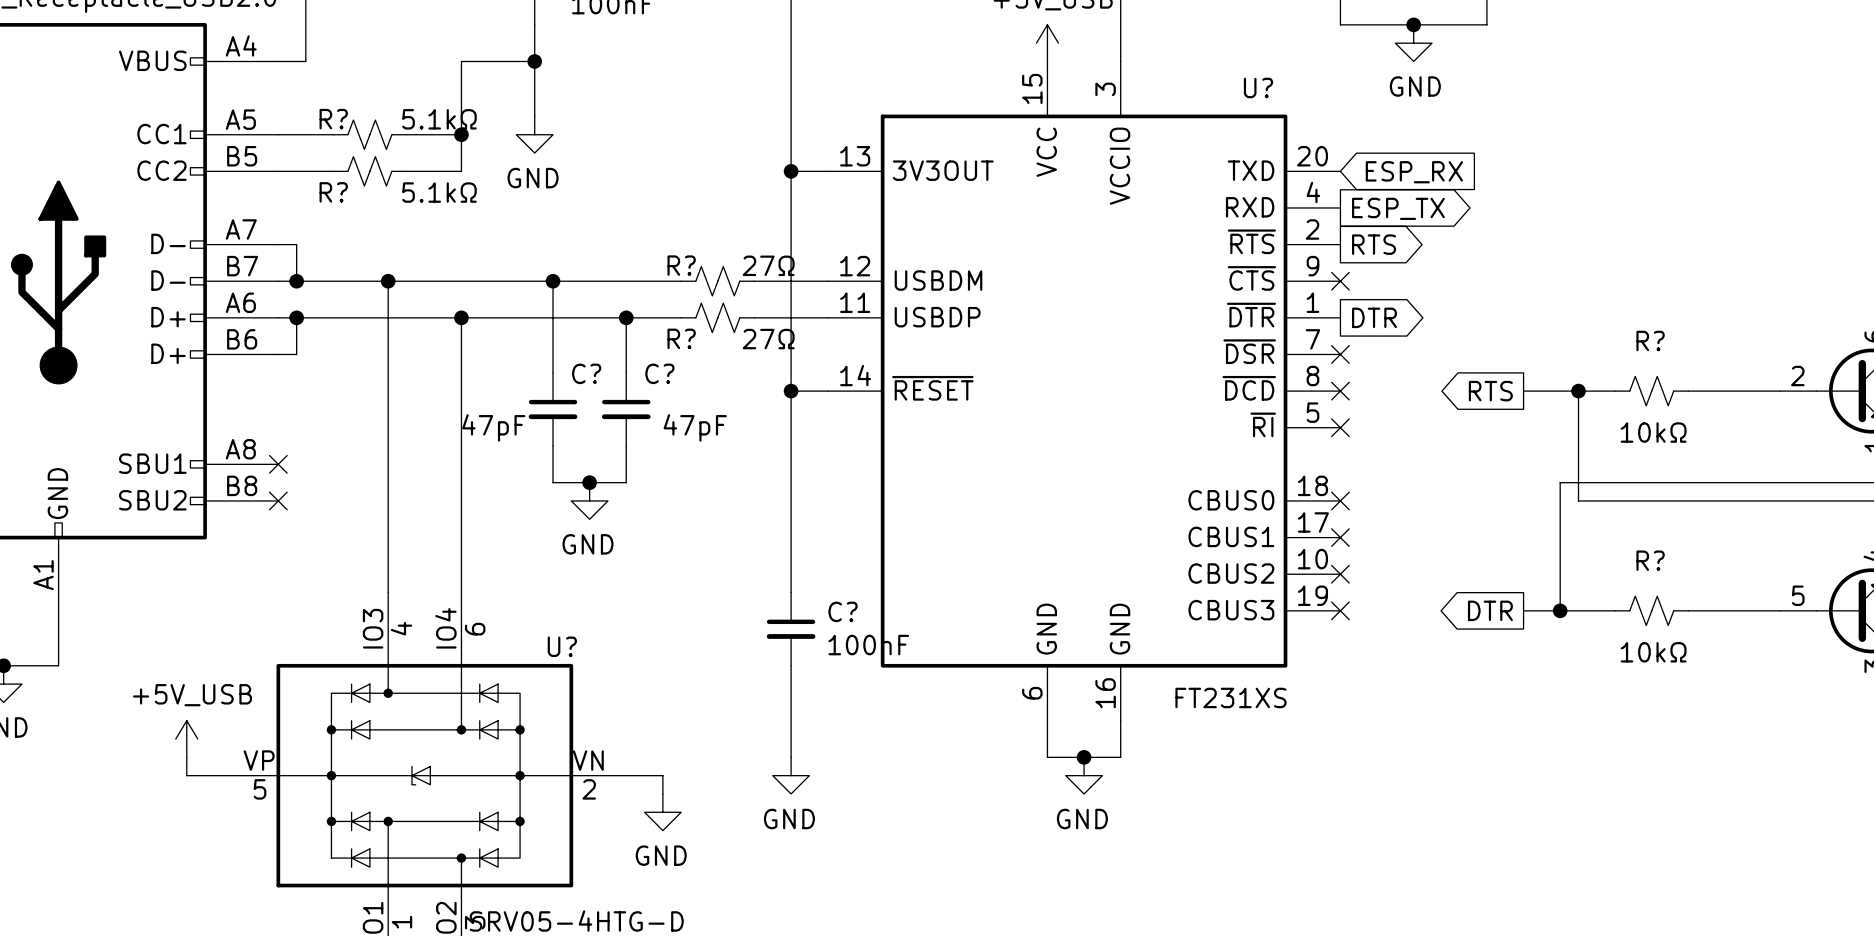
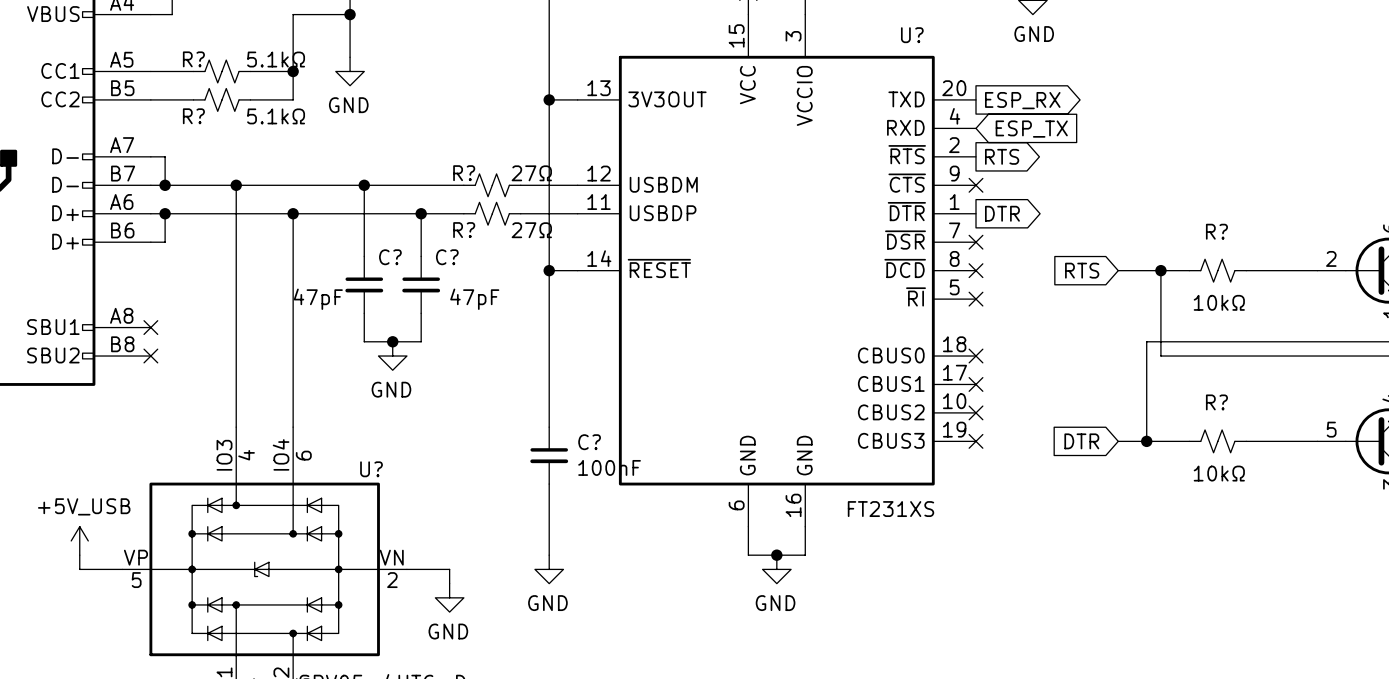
global label shape: input (1414, 172) -> output (1022, 100)
global label shape: output (1398, 208) -> input (1031, 129)
global label shape: output (1490, 391) -> input (1082, 270)
global label shape: output (1490, 610) -> input (1081, 441)

